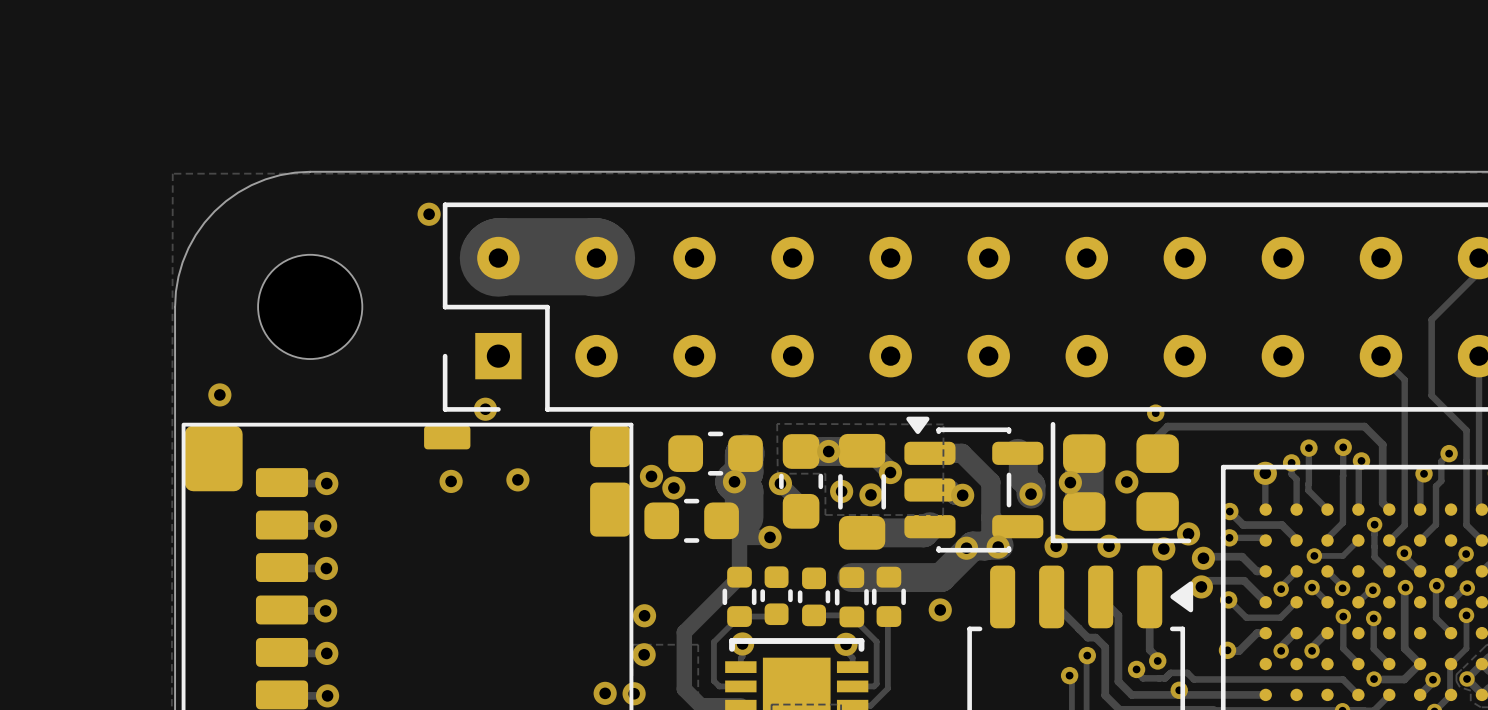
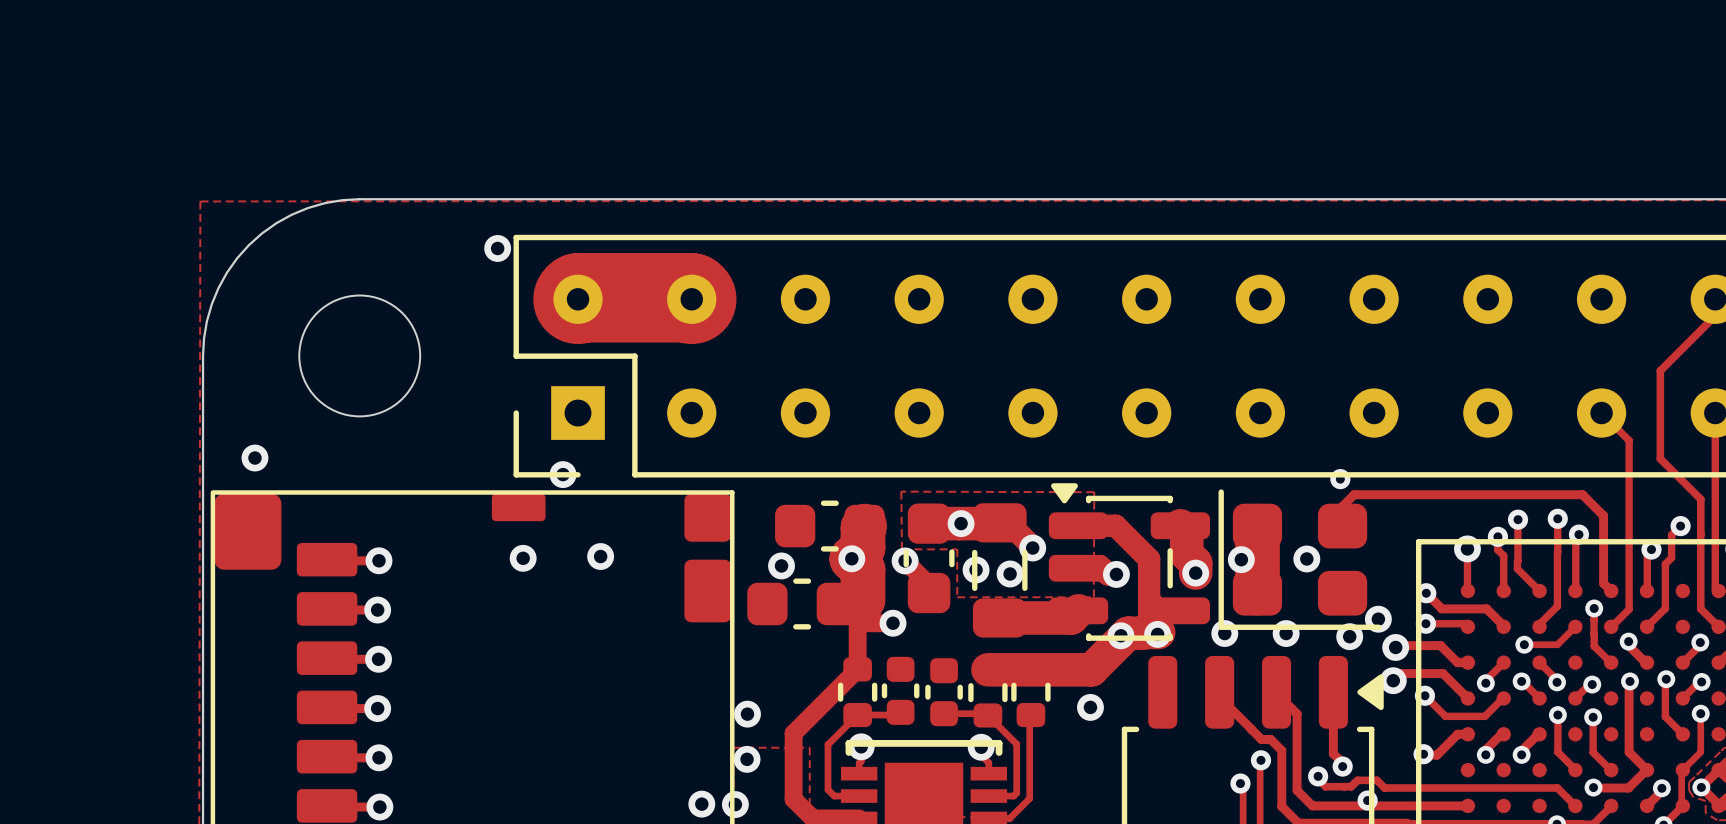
via: (651, 476) -> none

